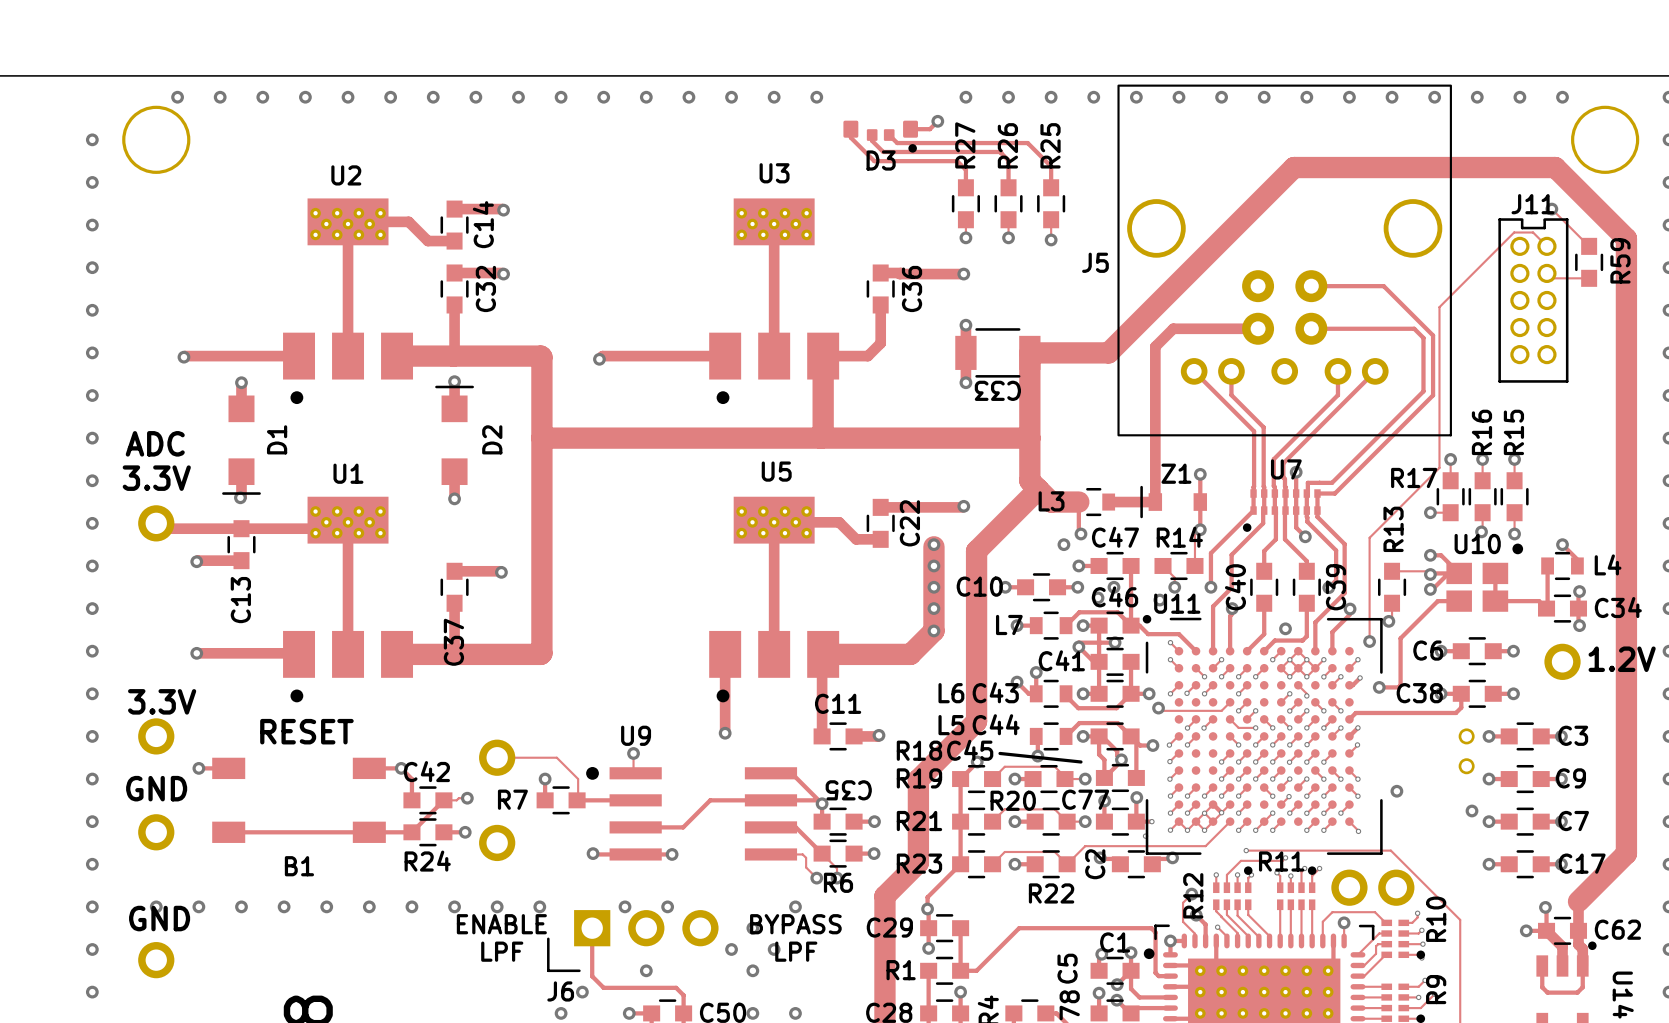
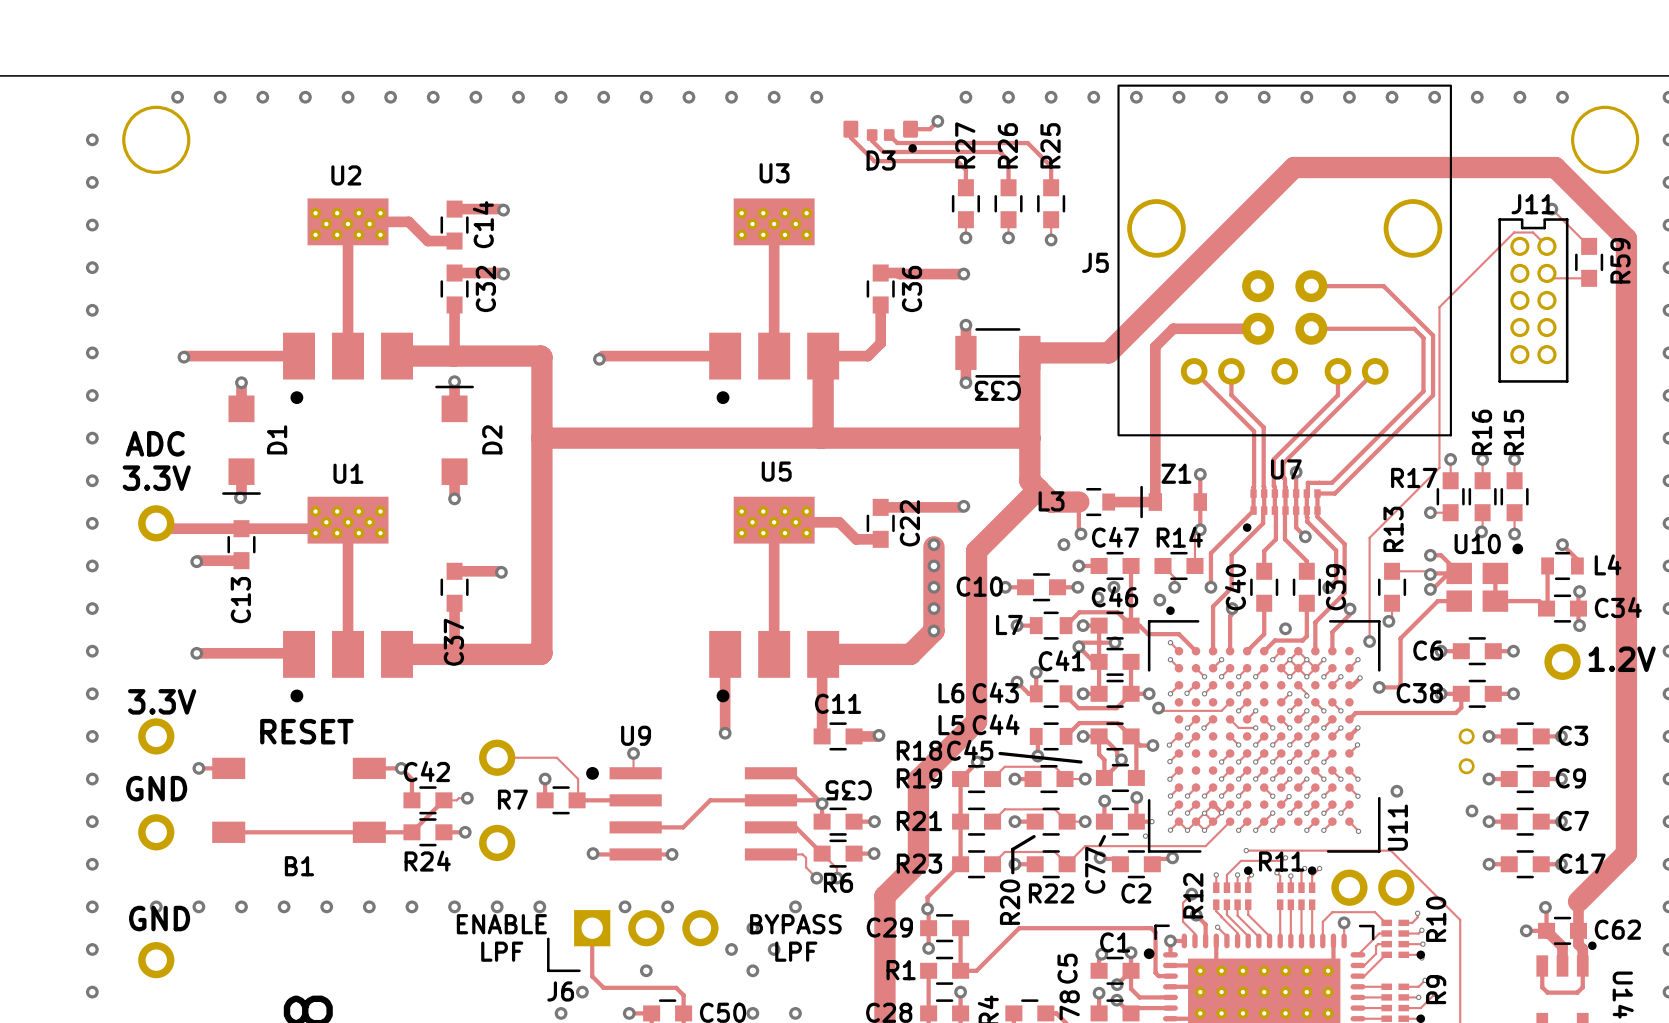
U11 name rotation: 0° (1177, 603) -> 90° counterclockwise (1397, 827)
U11 name position: U11 (1177, 603) -> U11 (1397, 827)
U11 footprint: [1142, 614, 1383, 855] -> [1147, 606, 1381, 853]
C77 name rotation: 0° (1085, 799) -> 90° counterclockwise (1095, 870)
C77 name position: C77 (1085, 799) -> C77 (1095, 870)
R20 name rotation: 0° (1013, 800) -> 90° counterclockwise (1010, 902)
R20 name position: R20 (1013, 800) -> R20 (1010, 902)
line: none -> (1034, 836) (1012, 849) (1012, 872)
line: none -> (1104, 836) (1100, 845)
C2 name rotation: 0° (1095, 864) -> 90° clockwise (1136, 893)
C2 name position: C2 (1095, 864) -> C2 (1136, 893)

